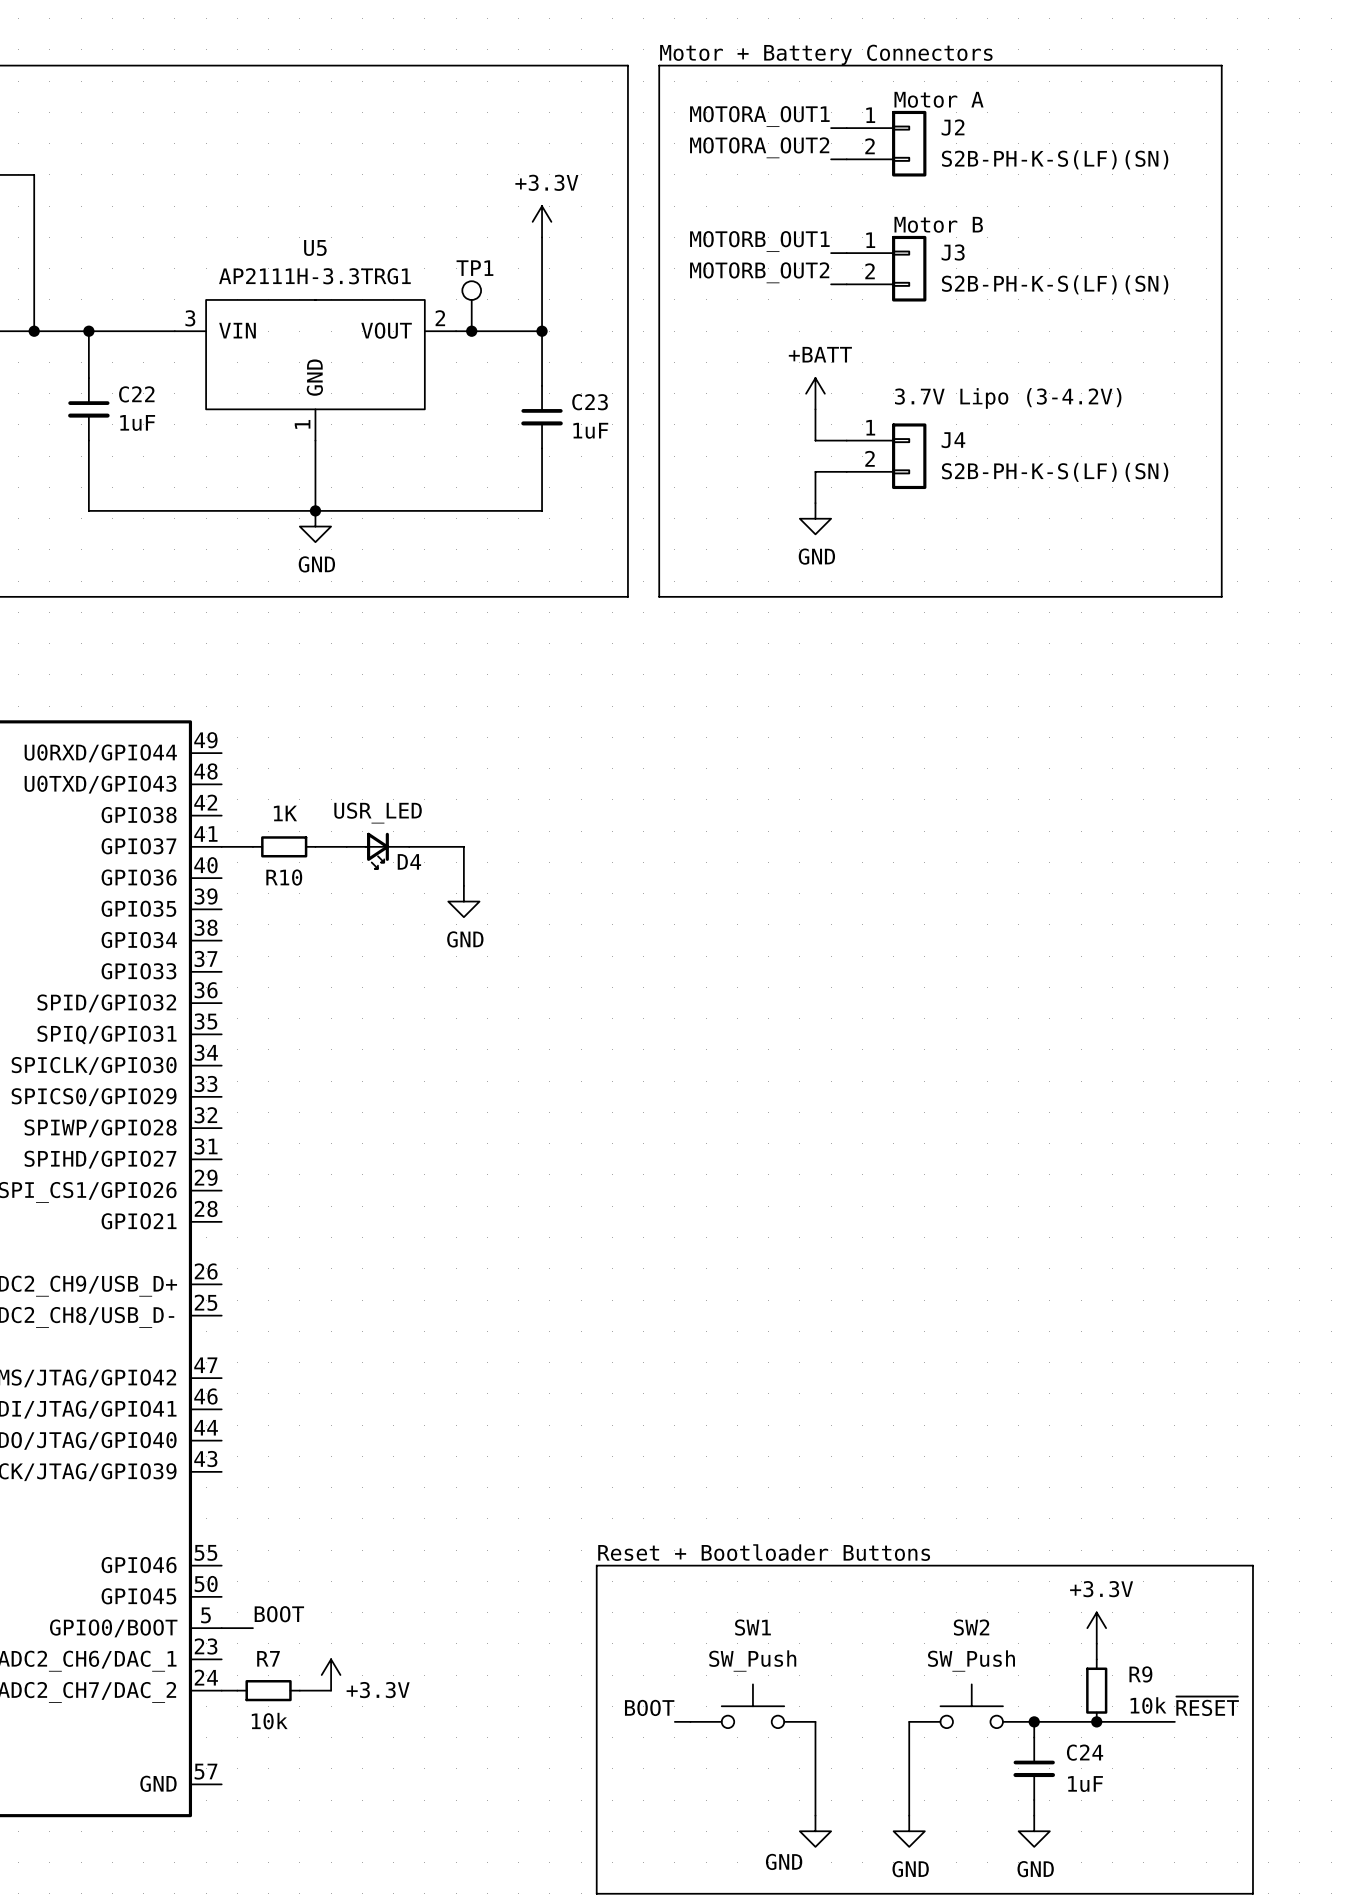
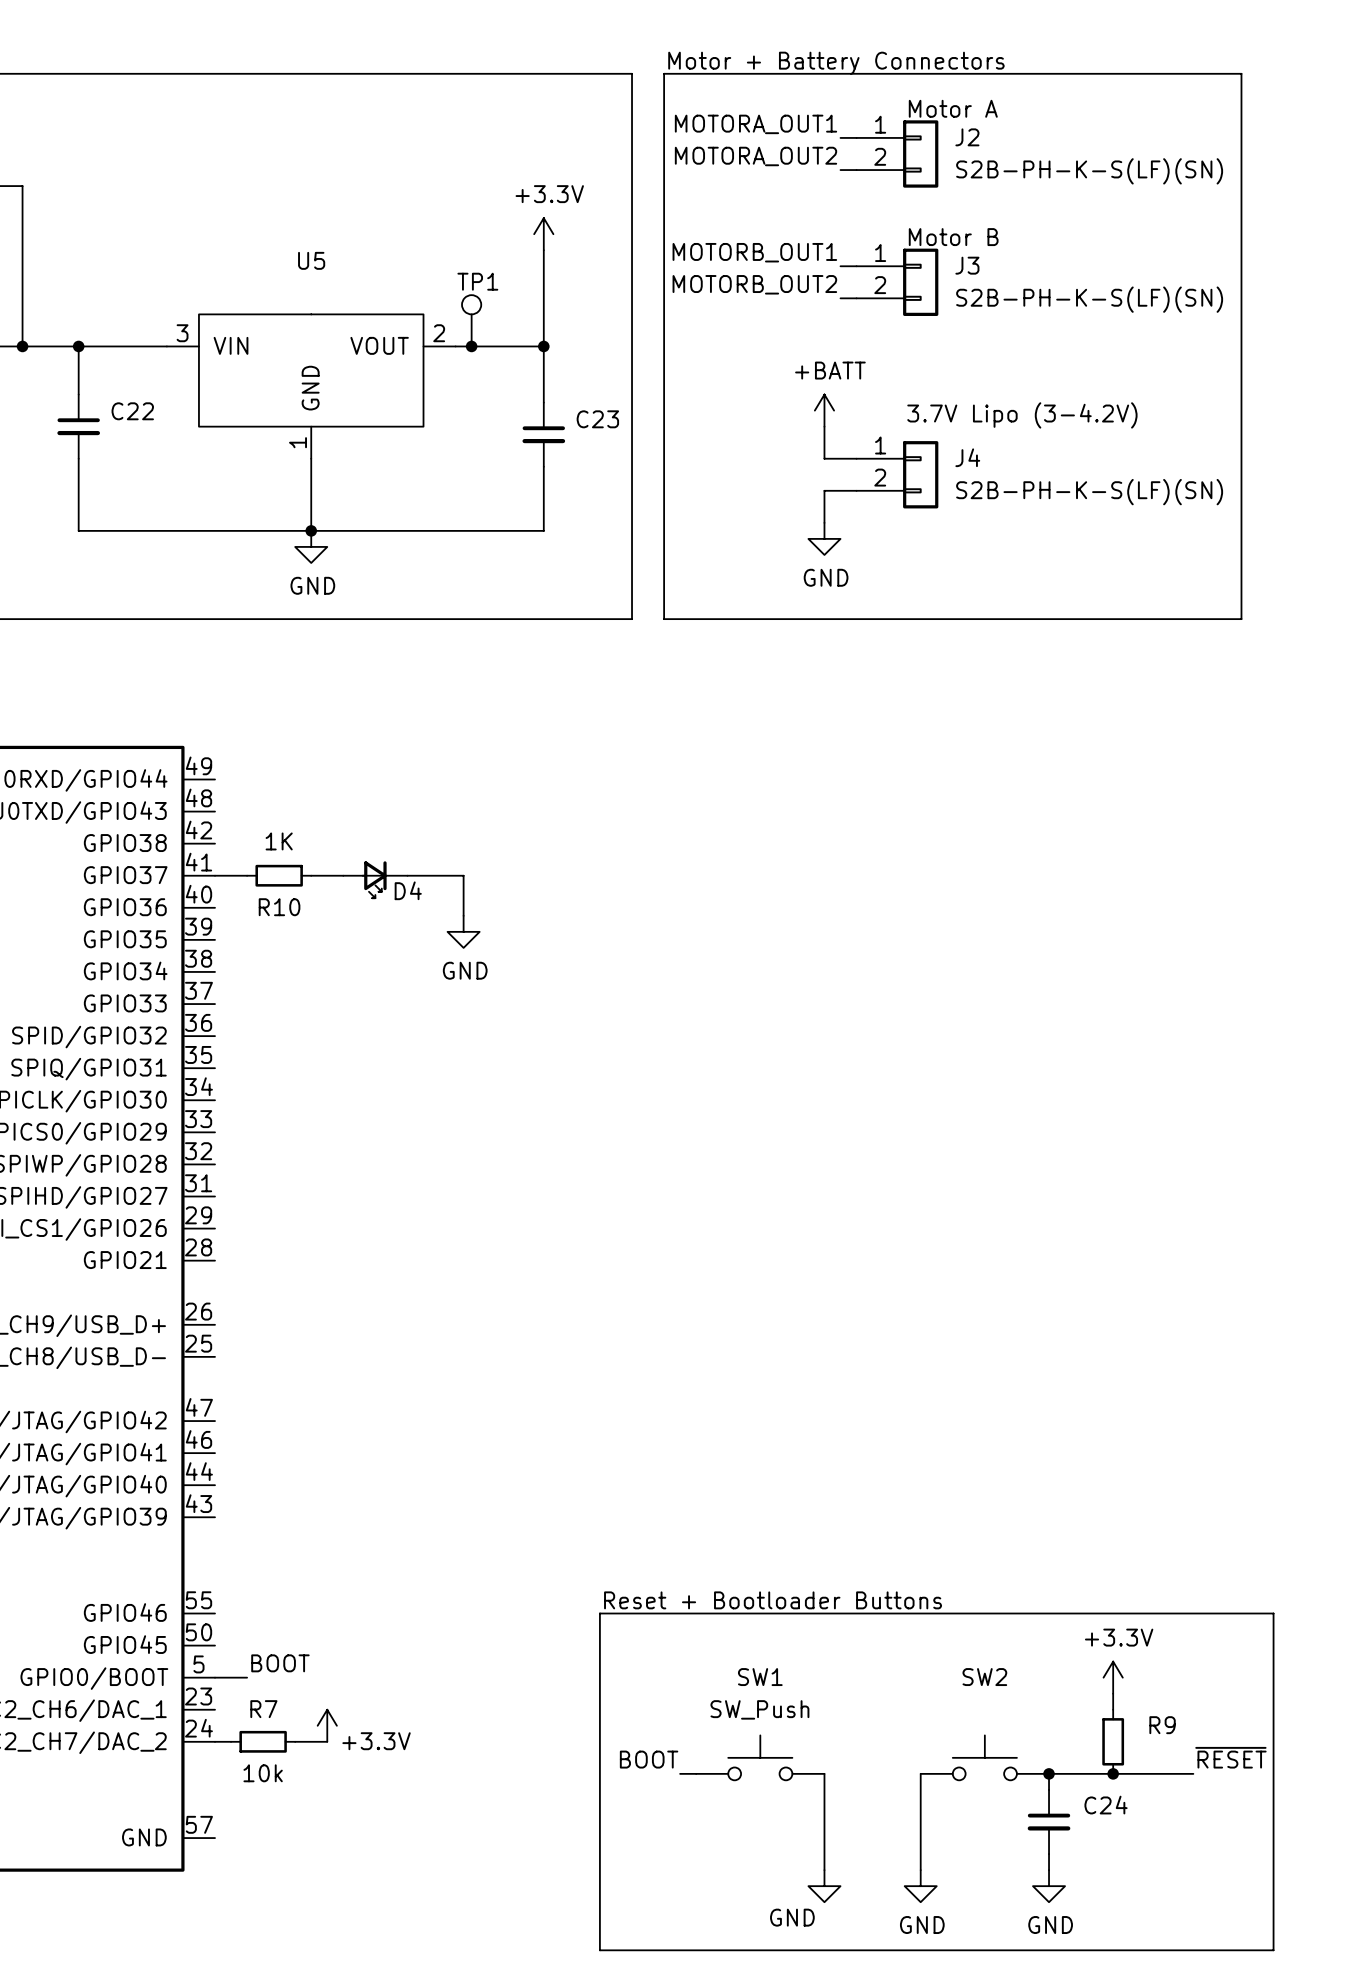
U5 value: AP2111H-3.3TRG1 (314, 276) -> none
C22 value: 1uF (137, 422) -> none
C23 value: 1uF (590, 430) -> none
D4 value: USR_LED (378, 813) -> none
SW2 value: SW_Push (971, 1660) -> none
R9 value: 10k (1148, 1705) -> none
C24 value: 1uF (1085, 1784) -> none

